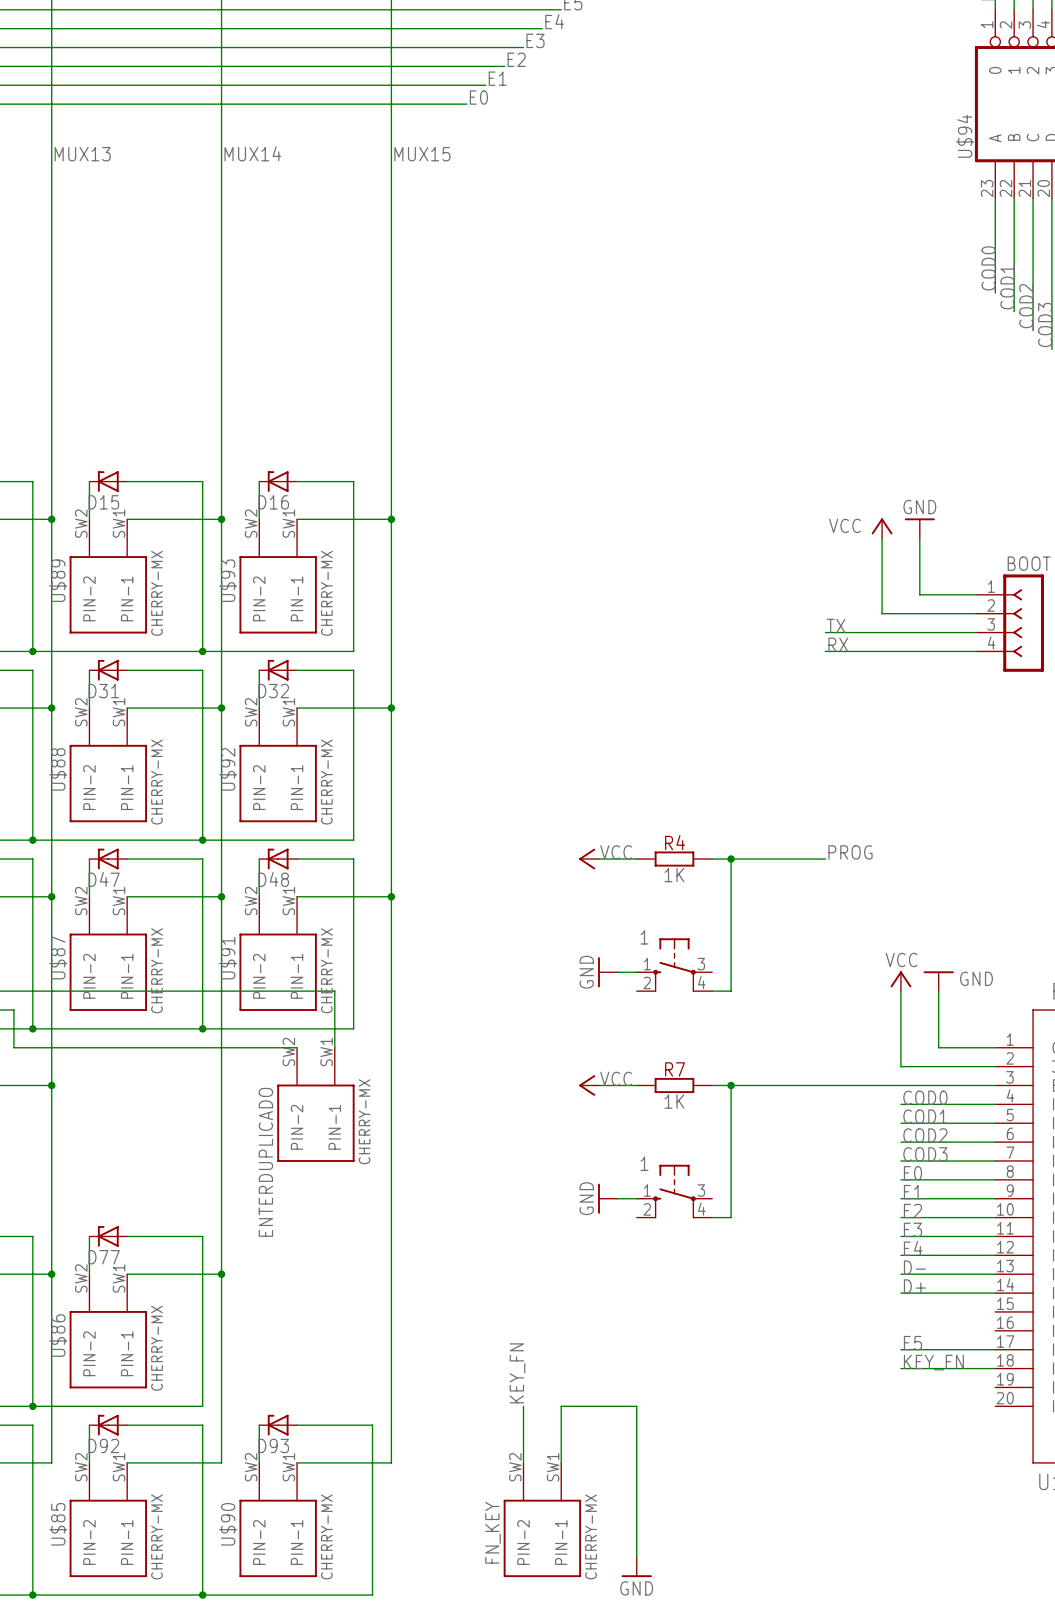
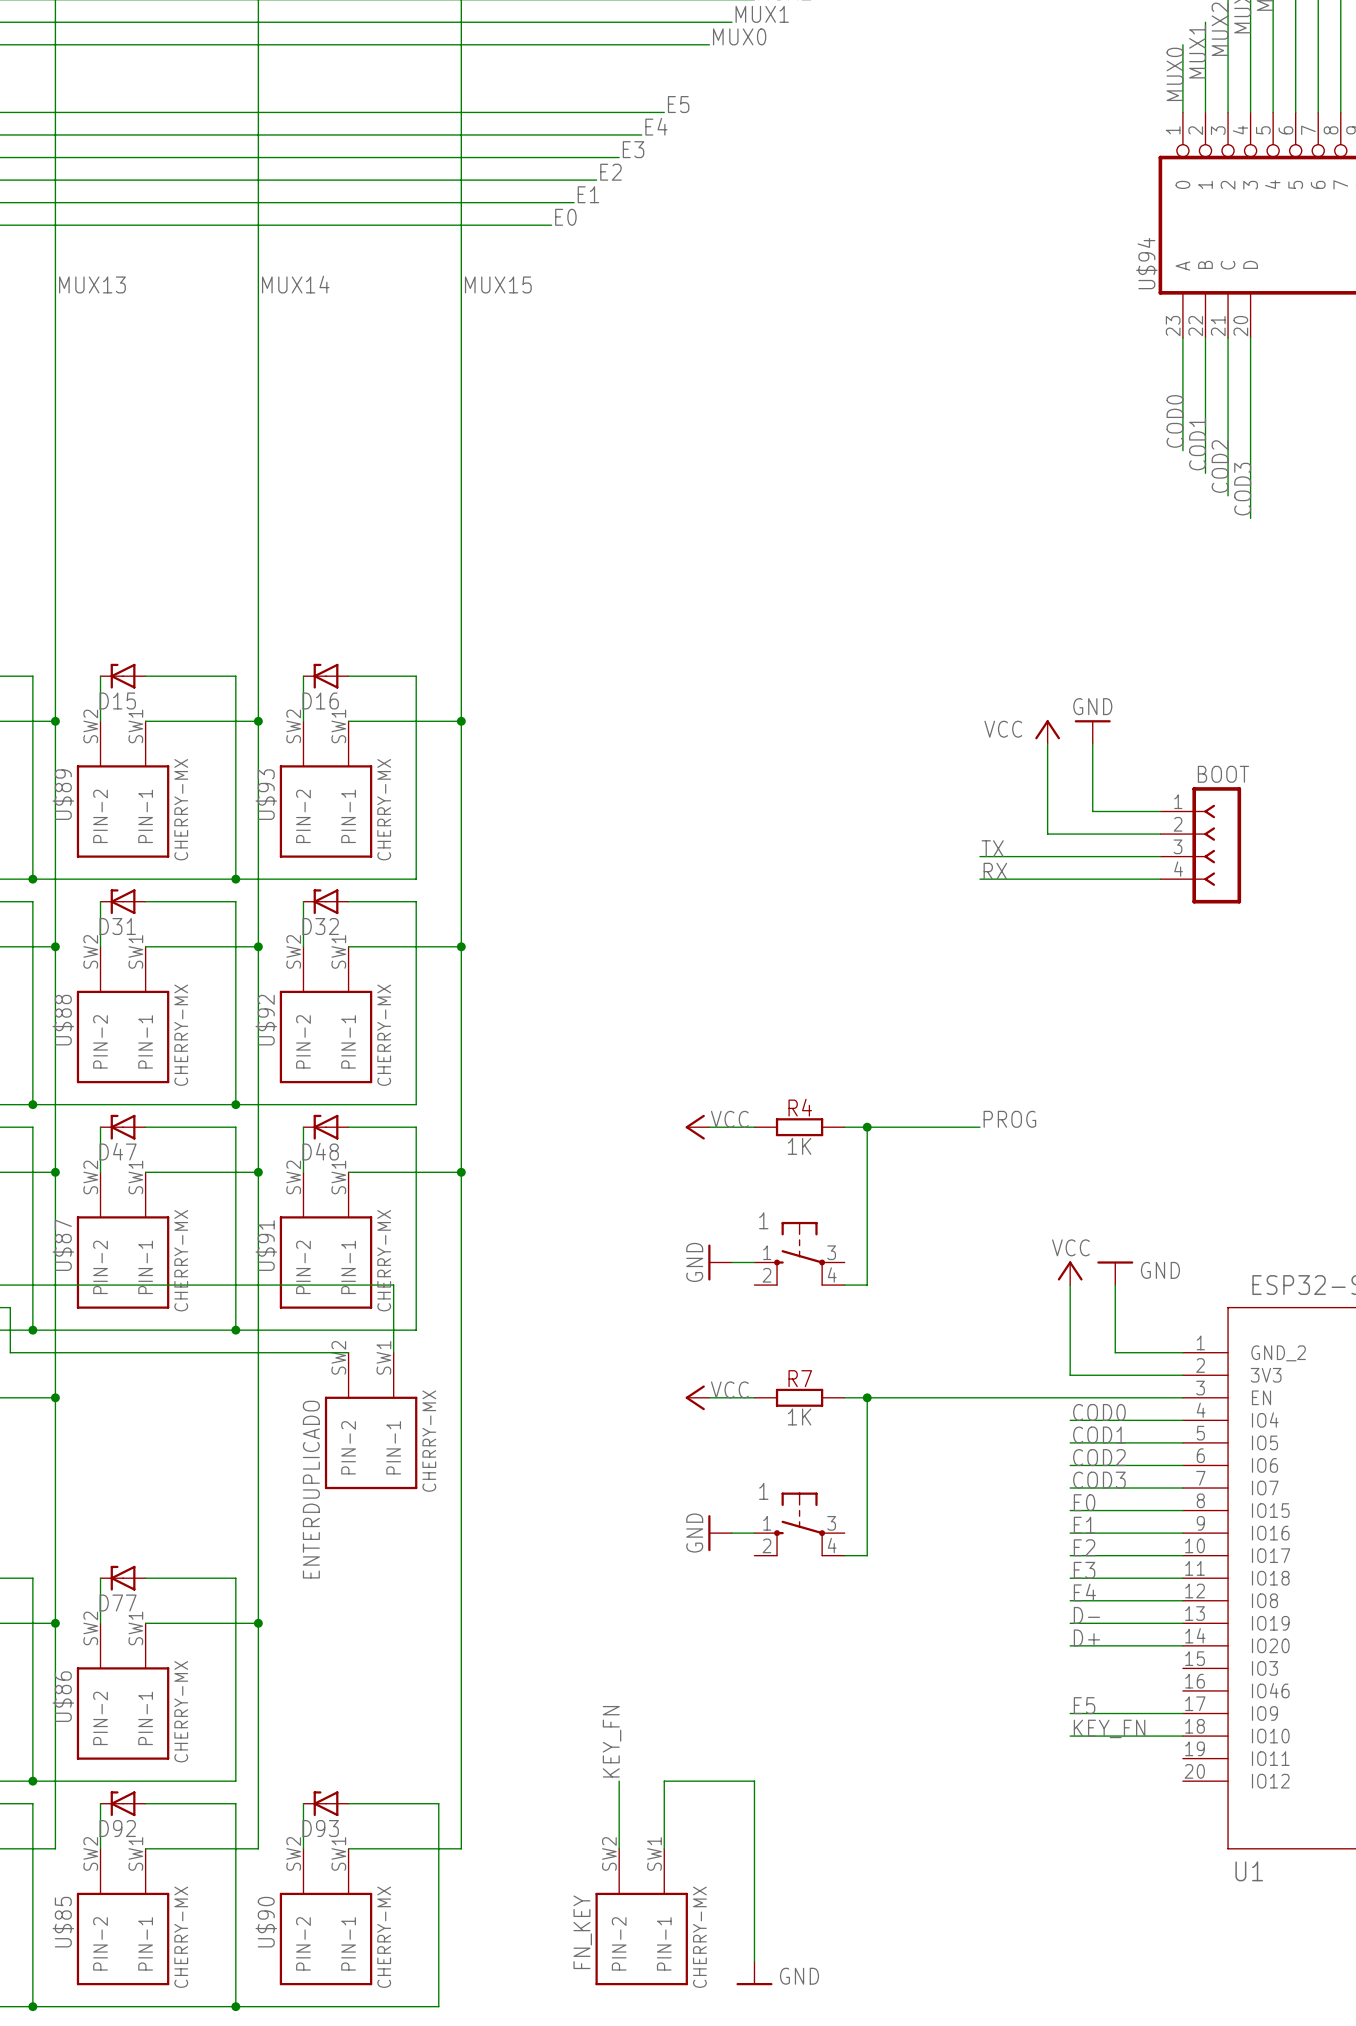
power symbol text position: GND (636, 1588) -> GND (799, 1976)

